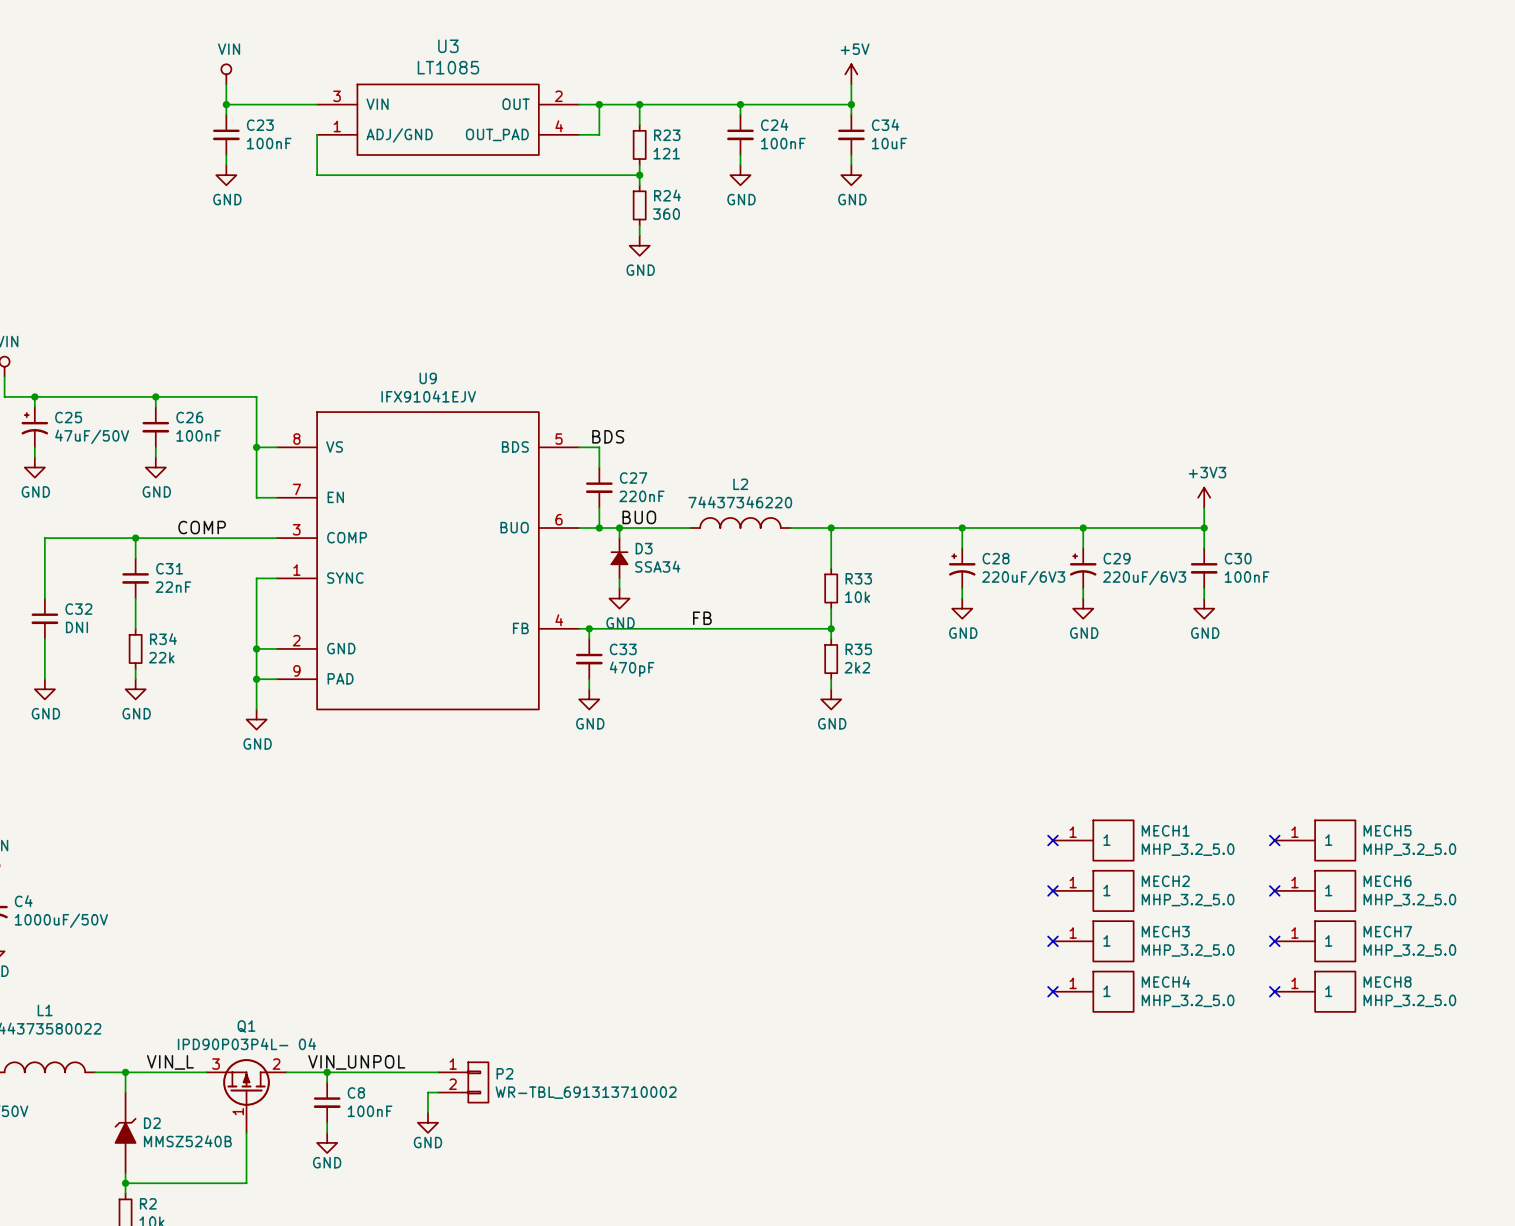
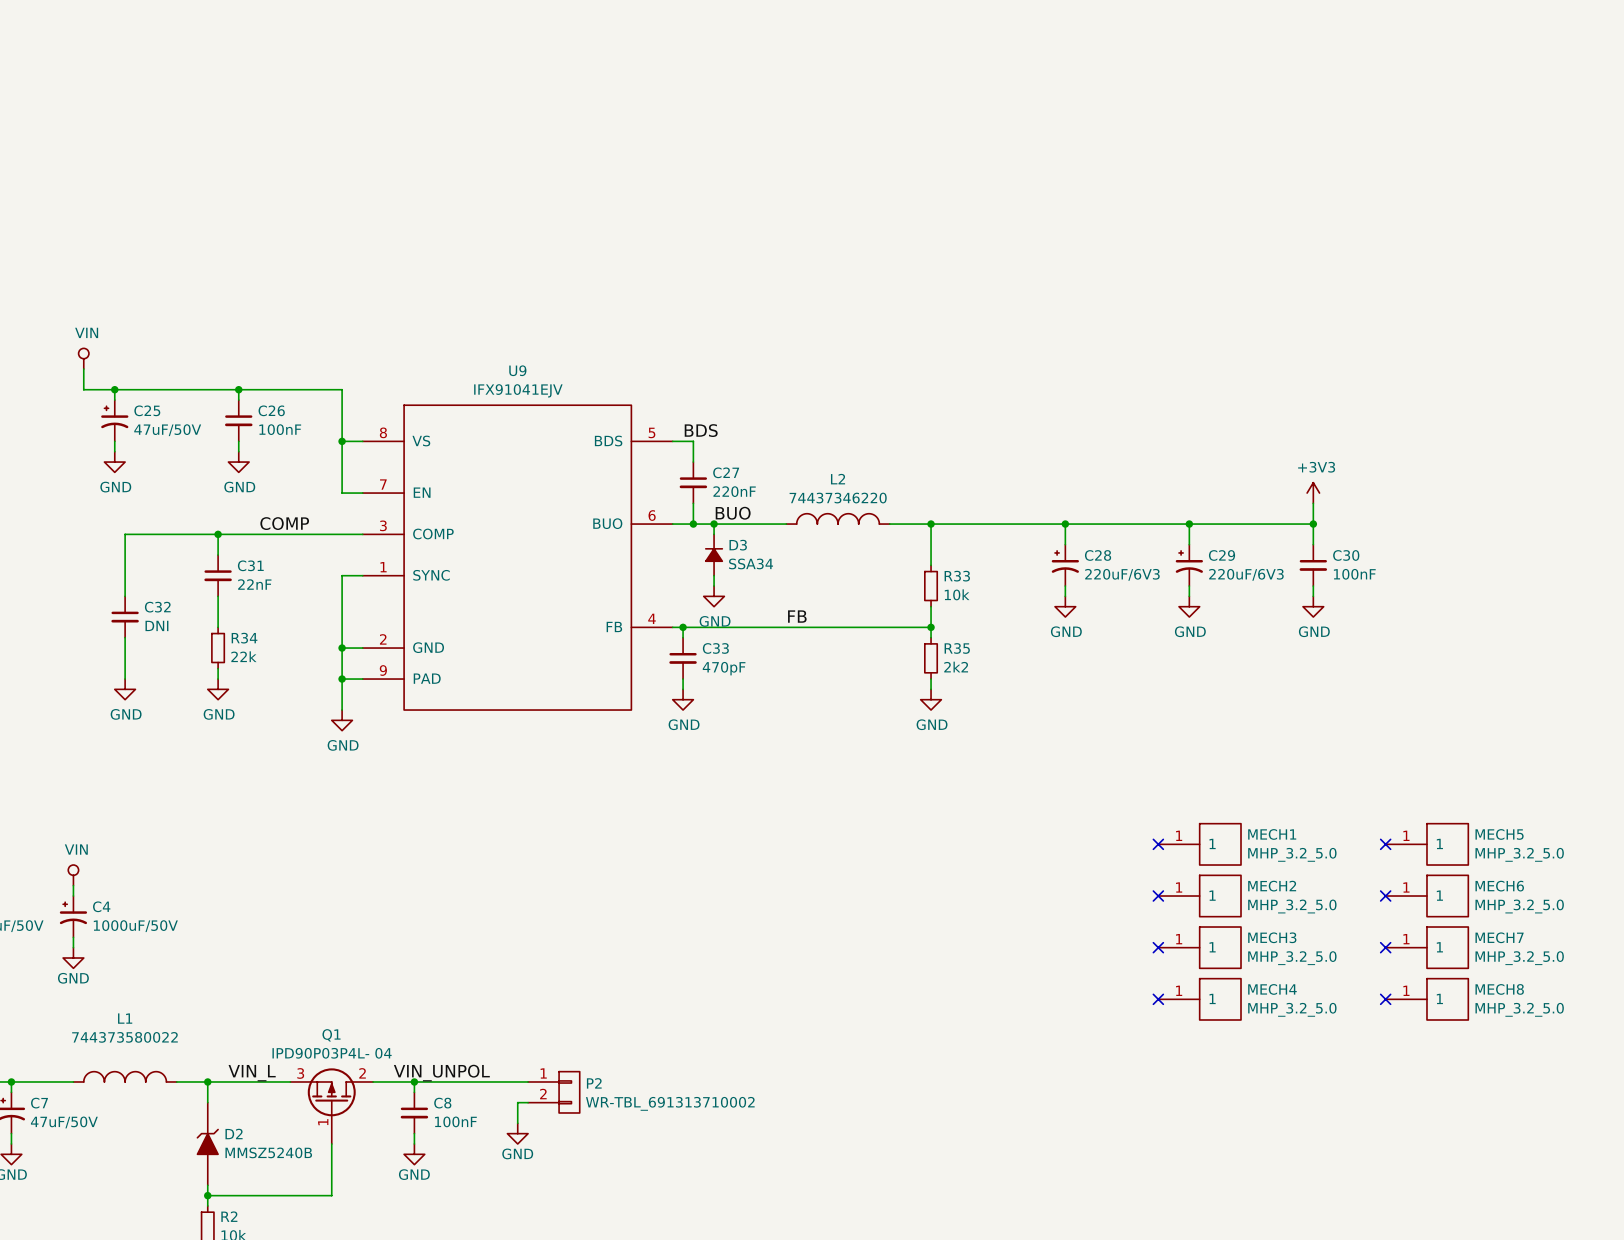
power symbol: VIN (226, 74) -> none
power symbol: +5V (851, 74) -> none
wire: (226, 84) (226, 114) -> none
wire: (851, 84) (851, 114) -> none
wire: (226, 104) (317, 104) -> none
junction: (226, 104) -> none
wire: (579, 104) (851, 104) -> none
wire: (599, 104) (599, 134) (579, 134) -> none
junction: (599, 104) -> none
wire: (639, 104) (639, 124) -> none
junction: (639, 104) -> none
wire: (740, 104) (740, 114) -> none
junction: (740, 104) -> none
junction: (851, 104) -> none
U3: LT1085 (448, 119) -> none
C23: 100nF (226, 134) -> none
wire: (317, 134) (317, 175) (639, 175) -> none
C24: 100nF (740, 134) -> none
C34: 10uF (851, 134) -> none
R23: 121 (639, 144) -> none
wire: (226, 155) (226, 165) -> none
wire: (740, 155) (740, 165) -> none
wire: (851, 155) (851, 165) -> none
wire: (639, 165) (639, 185) -> none
power symbol: GND (226, 175) -> none
junction: (639, 175) -> none
power symbol: GND (740, 175) -> none
power symbol: GND (851, 175) -> none
R24: 360 (639, 205) -> none
wire: (639, 225) (639, 235) -> none
power symbol: GND (639, 245) -> none

